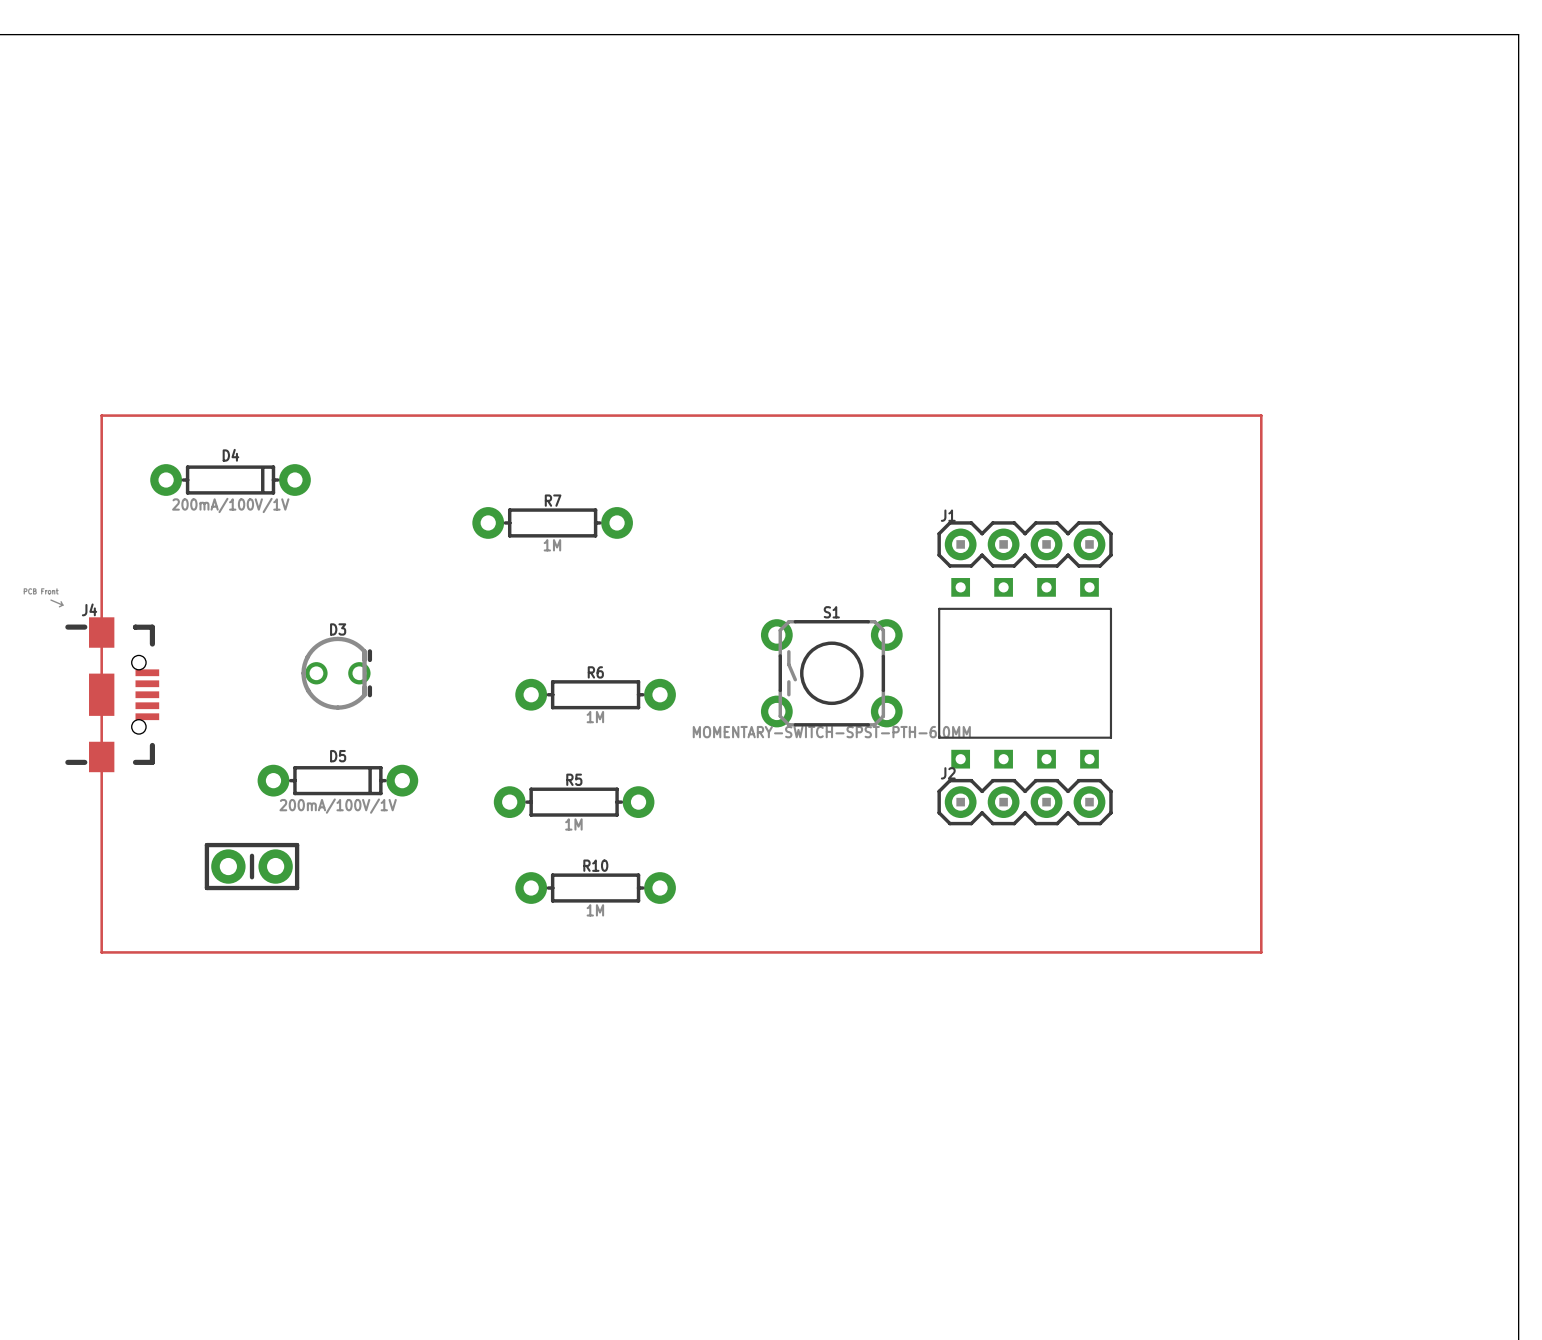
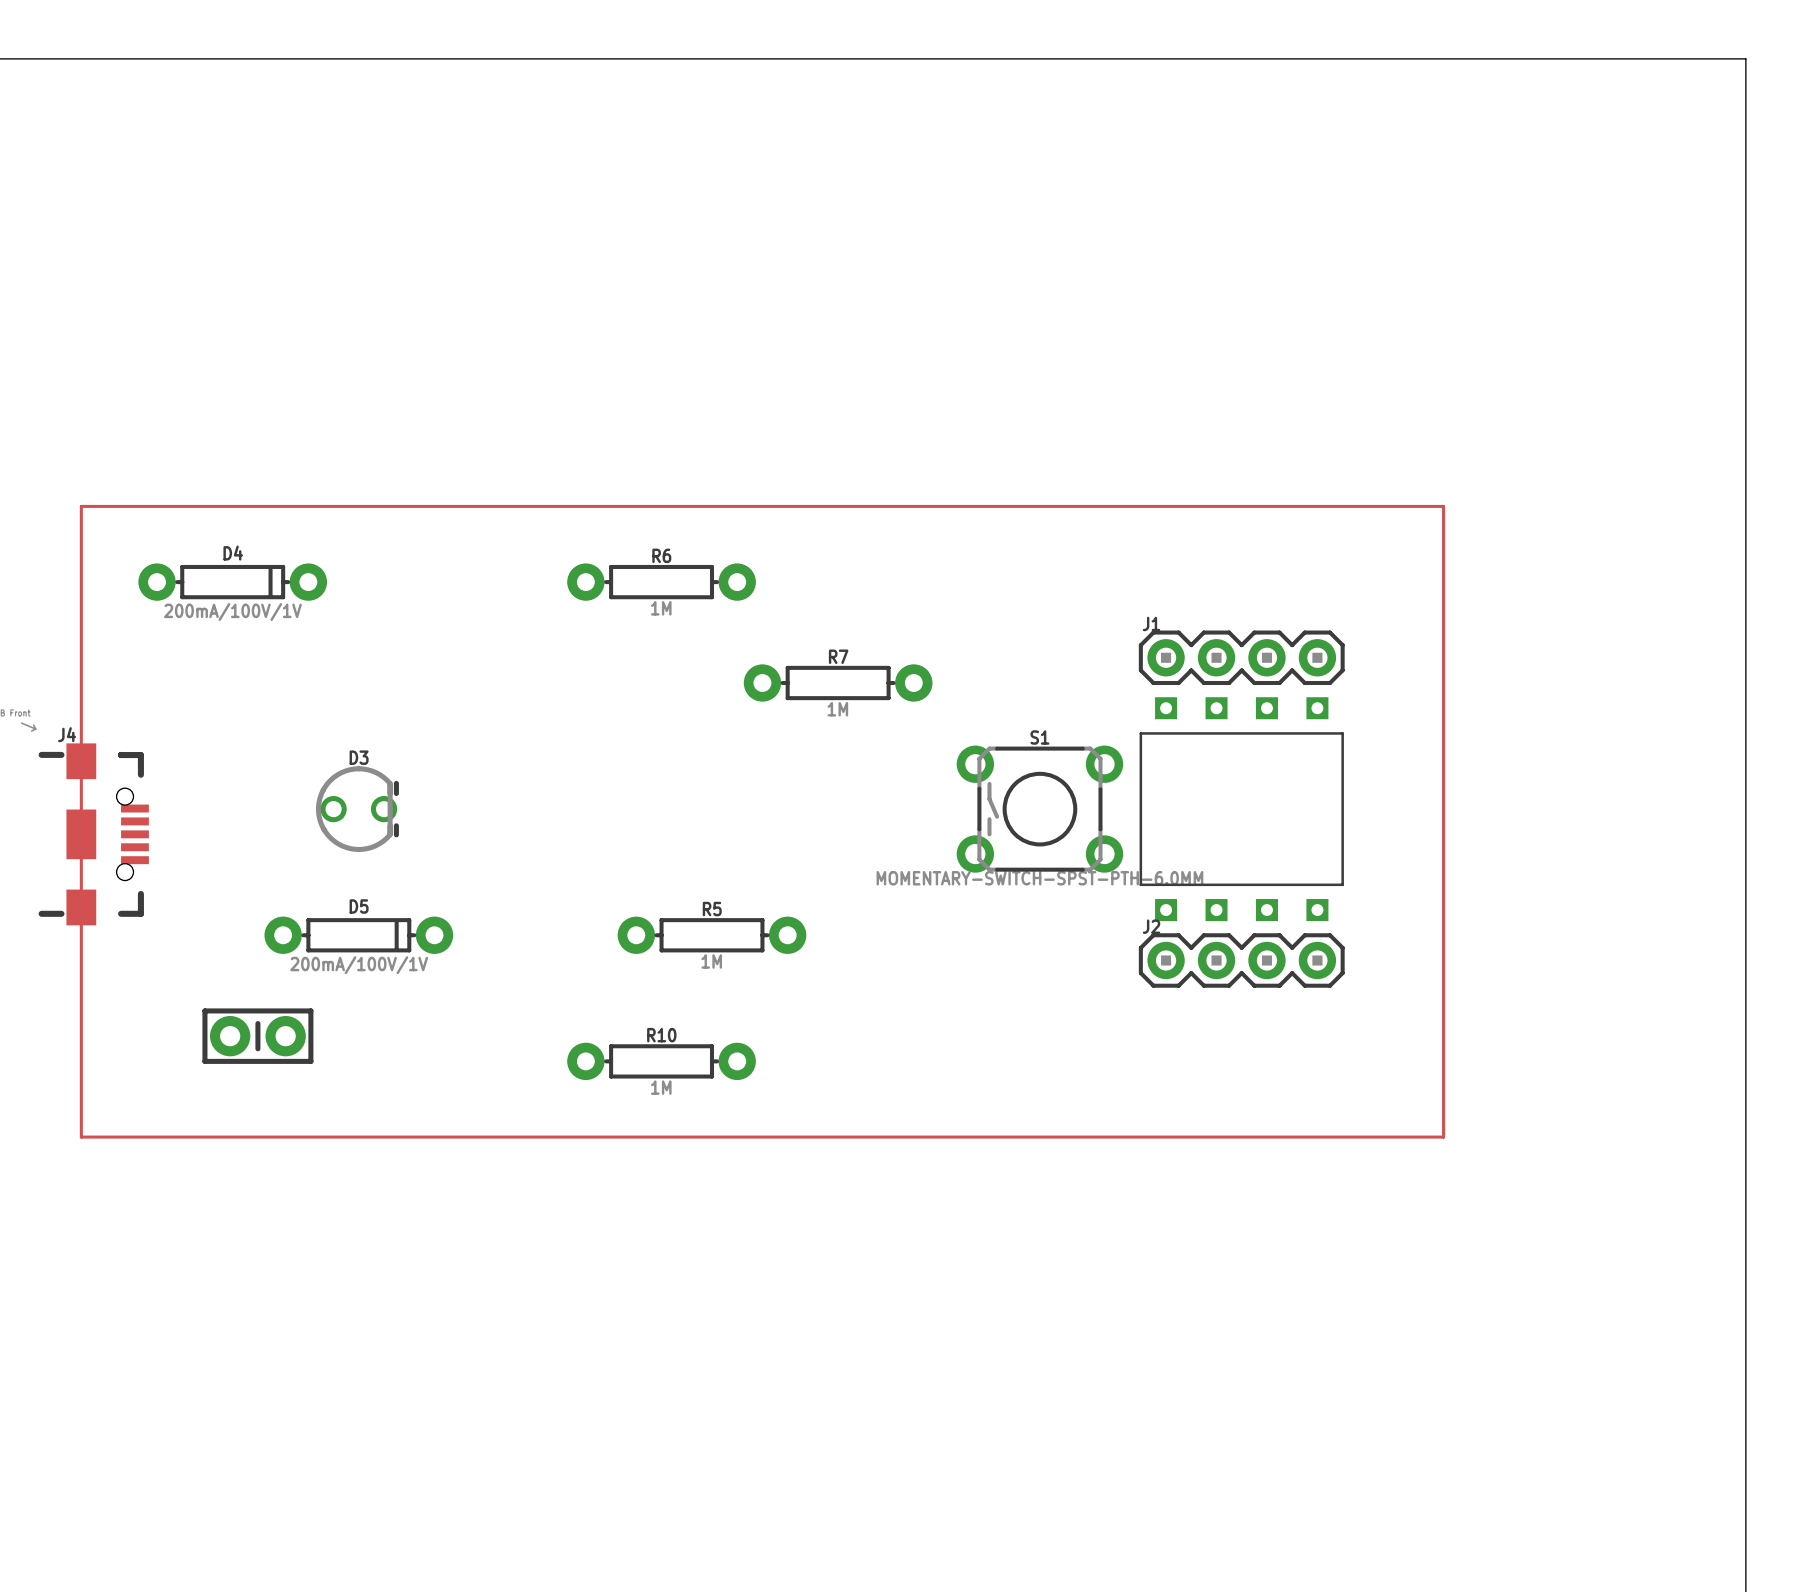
R7 position: (552, 522) -> (838, 683)
J1 position: (1025, 544) -> (1241, 657)
S1 position: (831, 673) -> (1039, 809)
part position: (1025, 673) -> (1241, 809)
R6 position: (595, 694) -> (661, 582)
R5 position: (574, 802) -> (712, 935)
J2 position: (1025, 802) -> (1241, 960)

